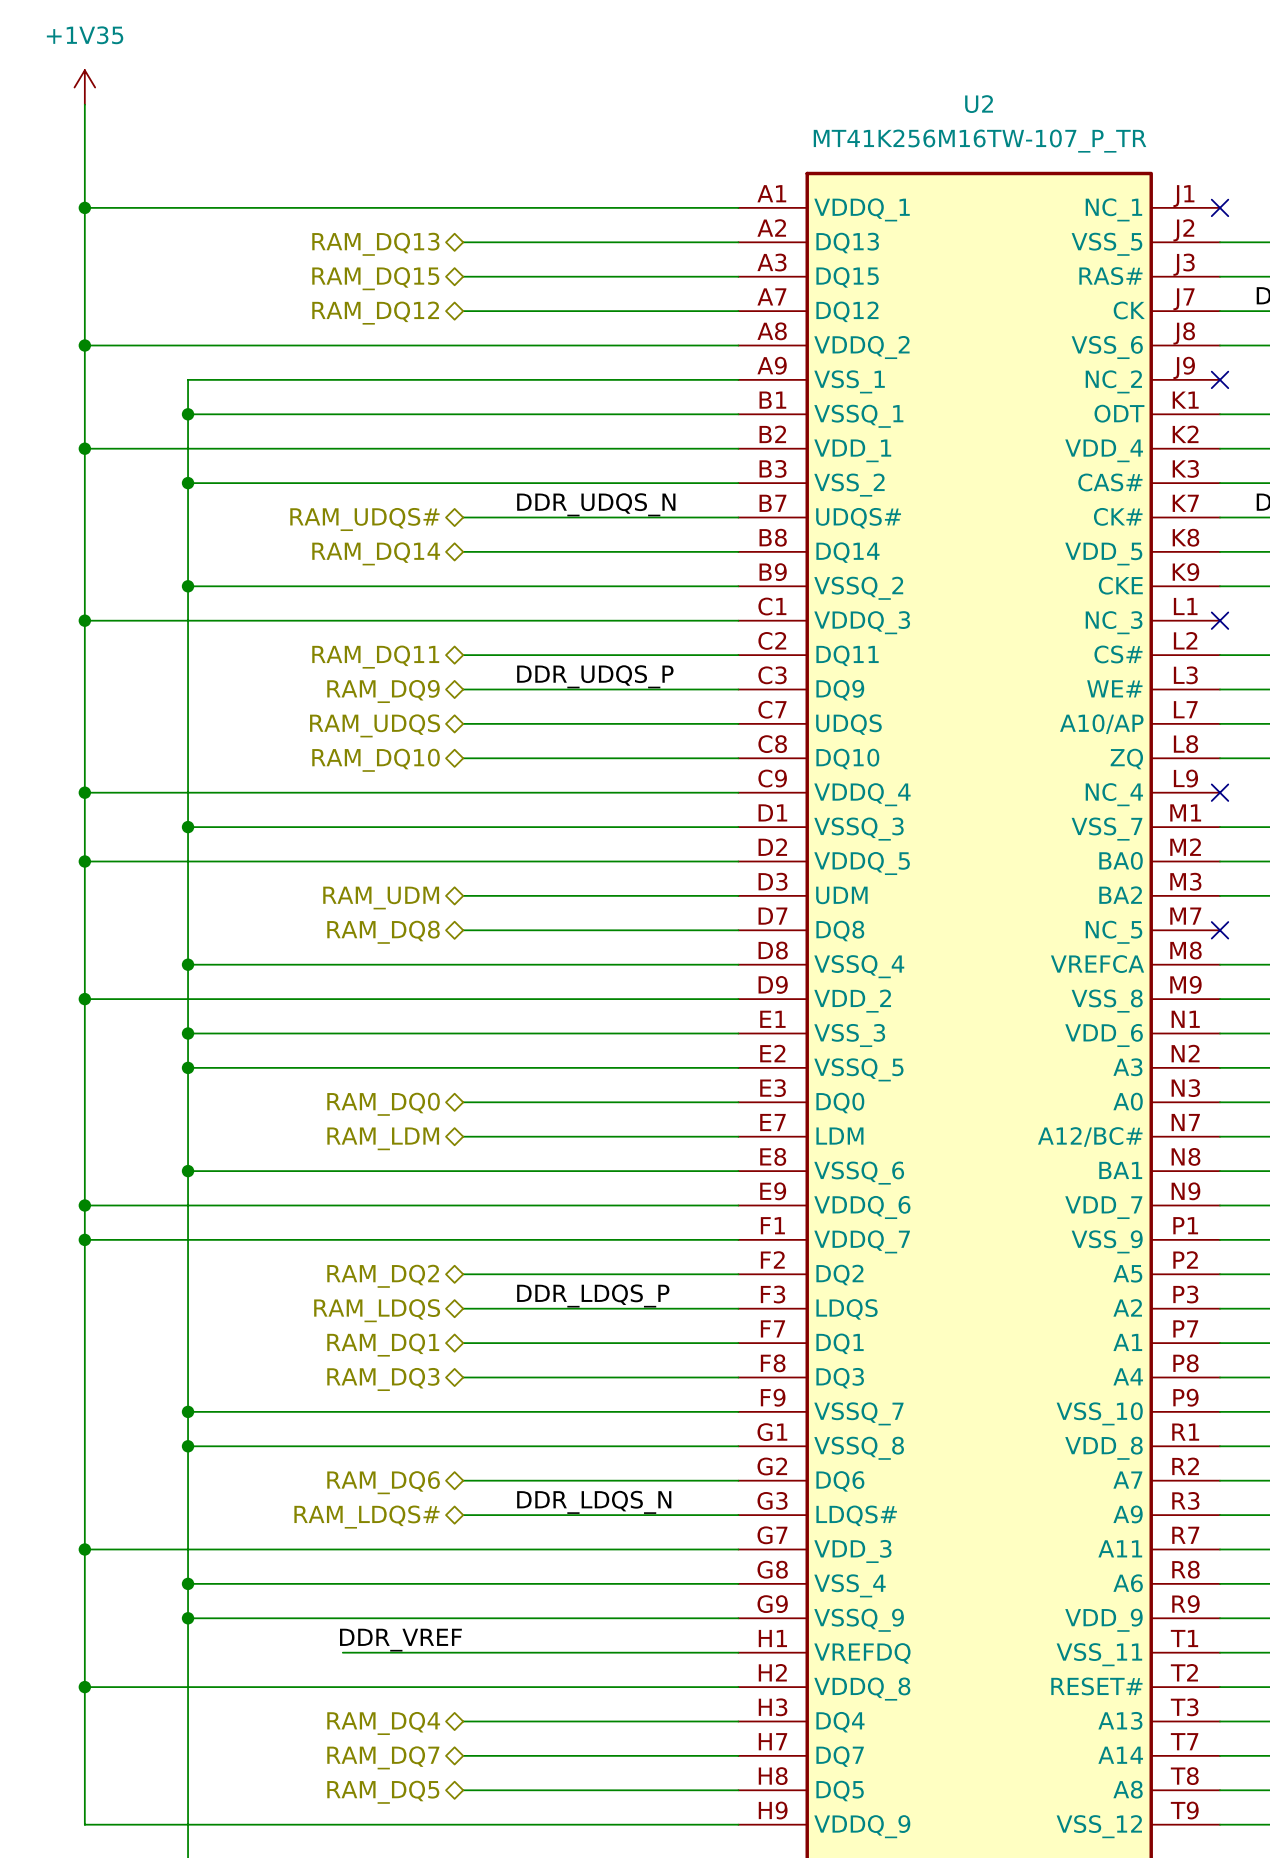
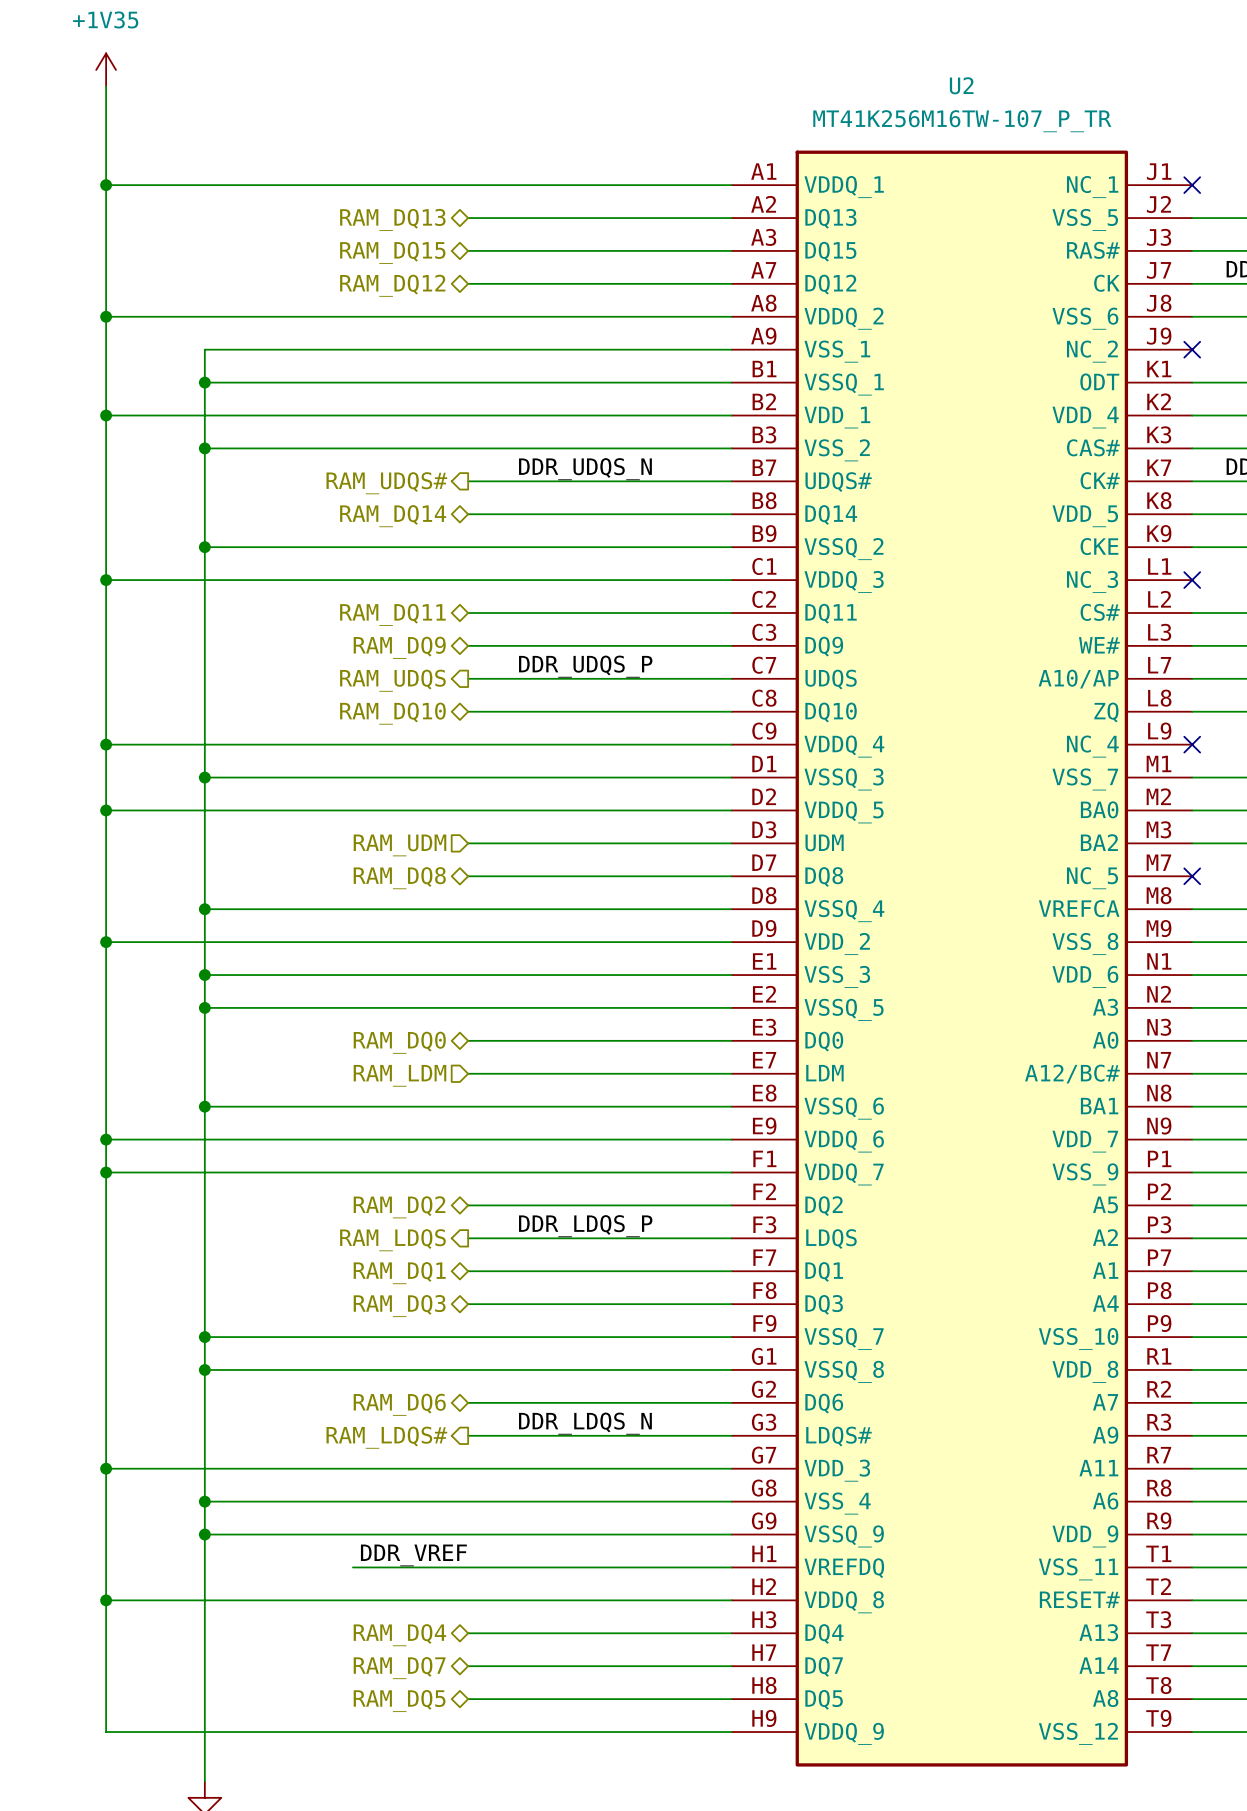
hierarchical label shape: bidirectional (364, 519) -> output (386, 483)
label position: DDR_UDQS_P (595, 676) -> DDR_UDQS_P (585, 666)
hierarchical label shape: bidirectional (375, 725) -> output (392, 680)
hierarchical label shape: bidirectional (381, 898) -> input (399, 845)
hierarchical label shape: bidirectional (383, 1138) -> input (399, 1075)
hierarchical label shape: bidirectional (377, 1310) -> output (392, 1240)
hierarchical label shape: bidirectional (366, 1517) -> output (386, 1437)

